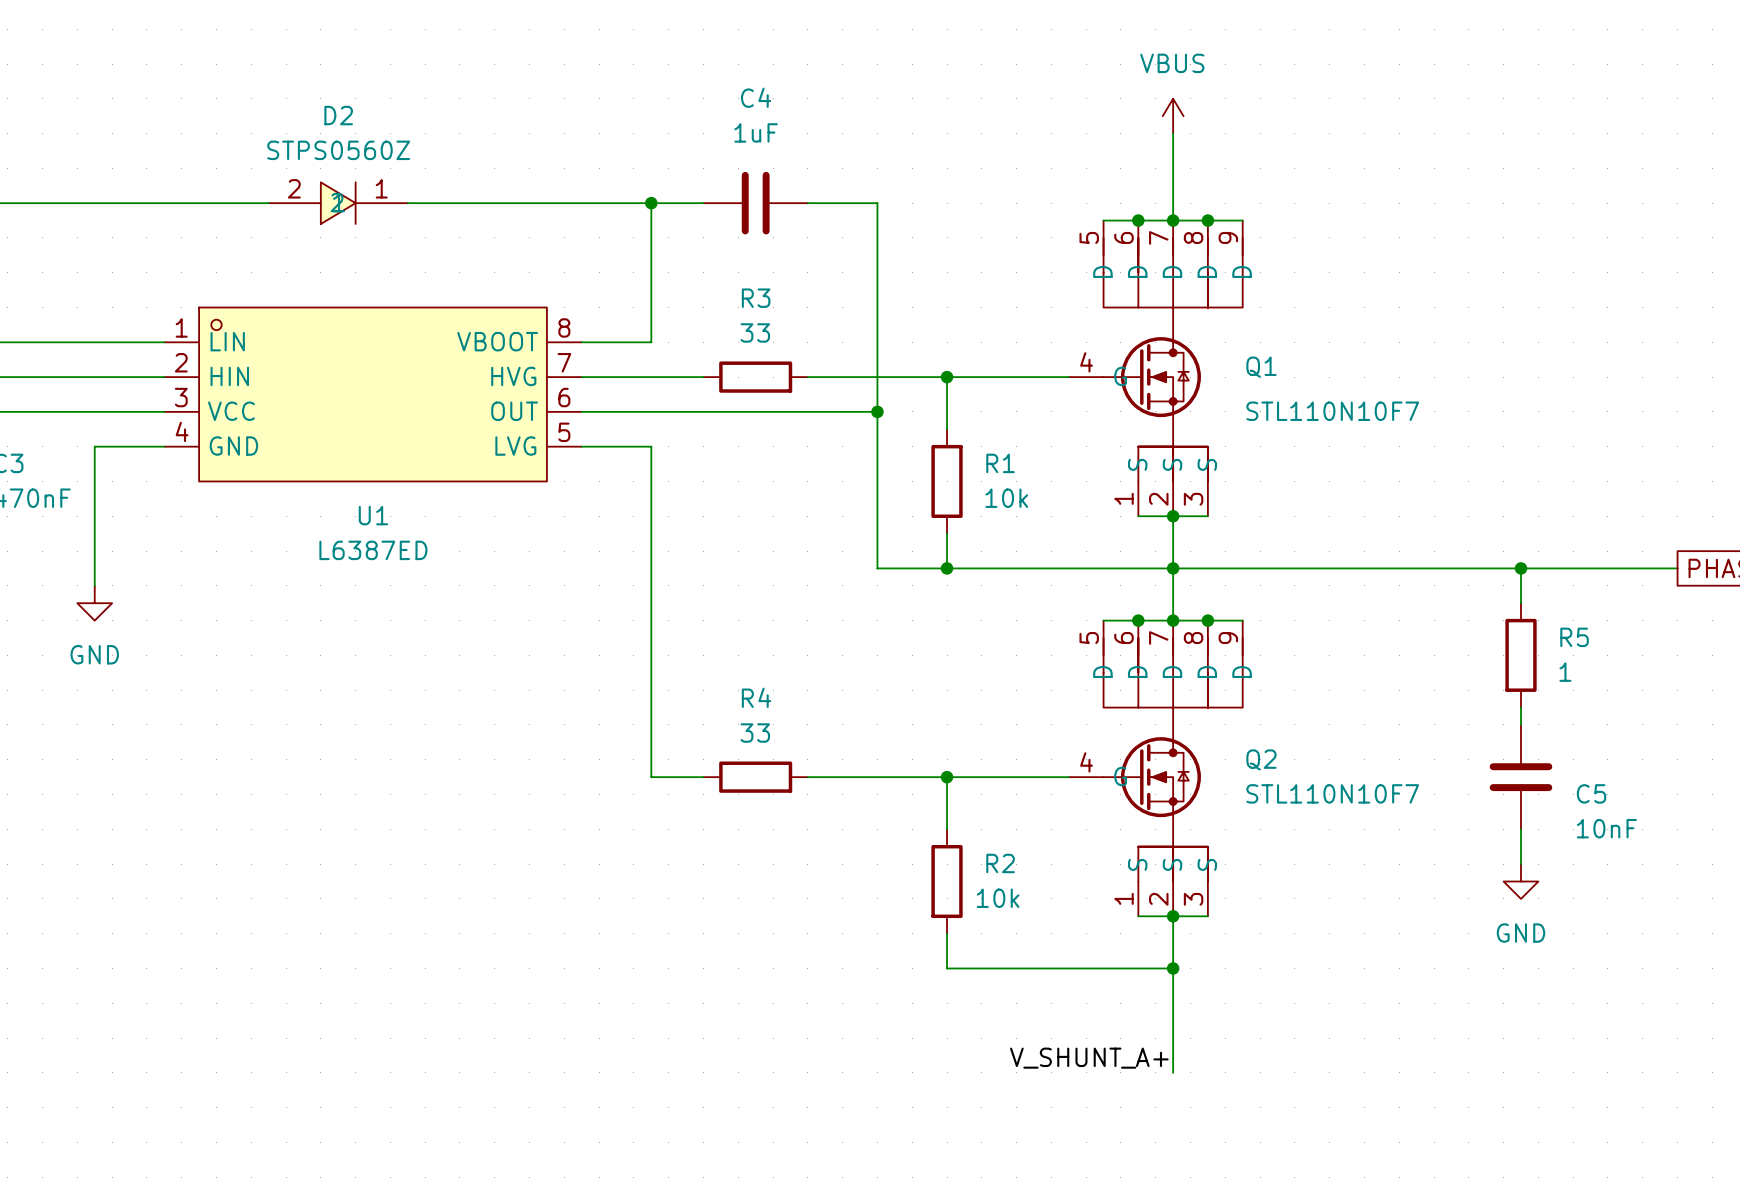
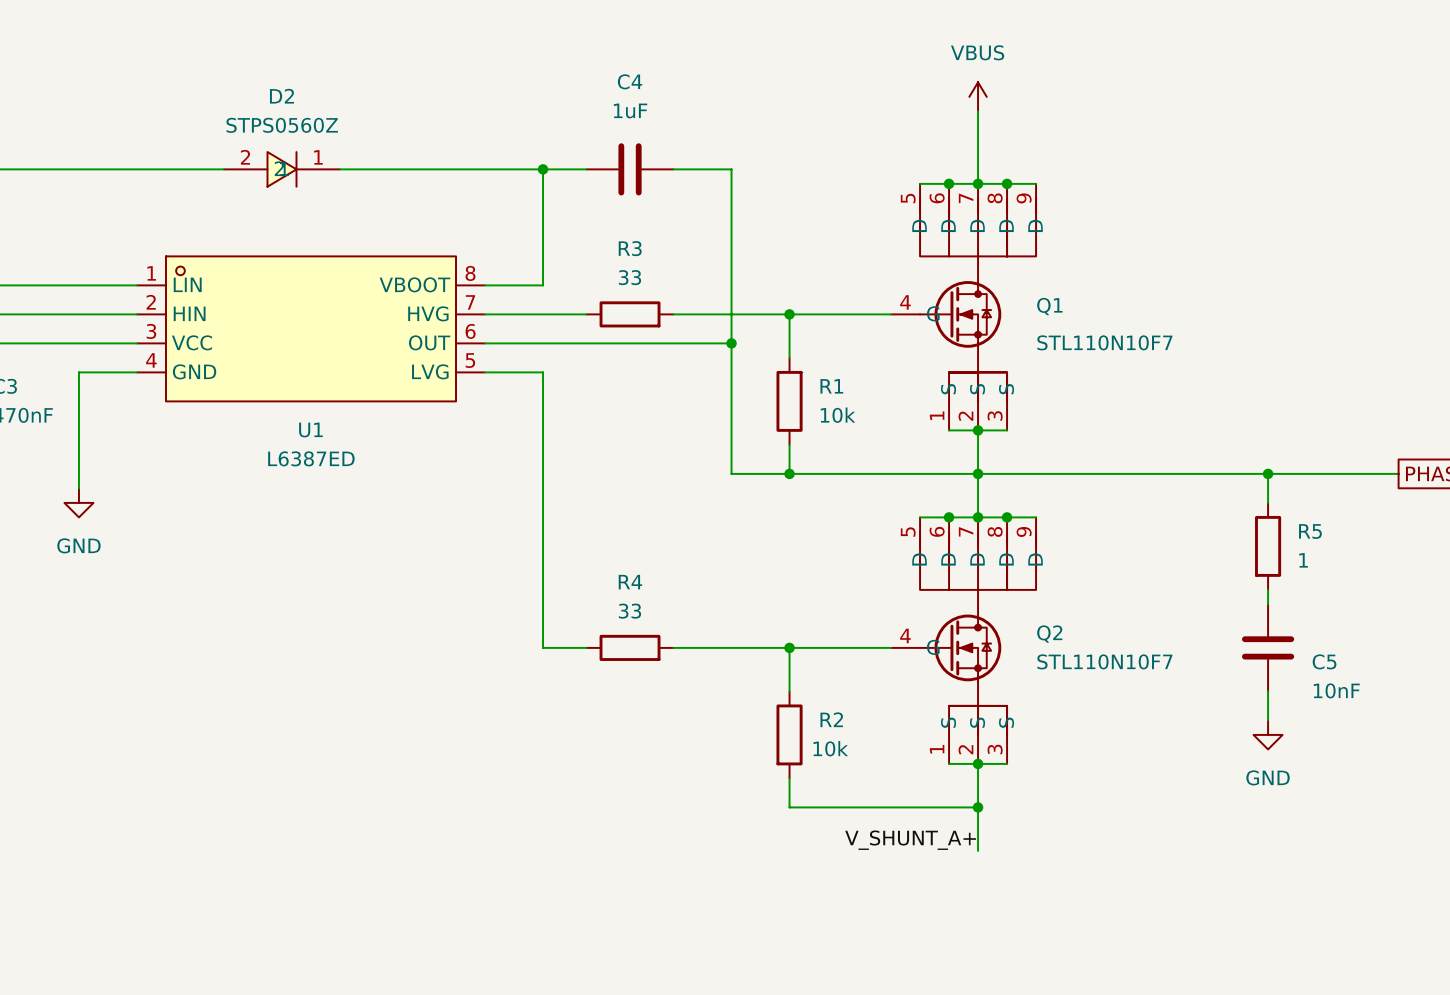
wire: (1173, 1020) (1173, 1072) -> none
label position: V_SHUNT_A+ (1089, 1058) -> V_SHUNT_A+ (910, 840)

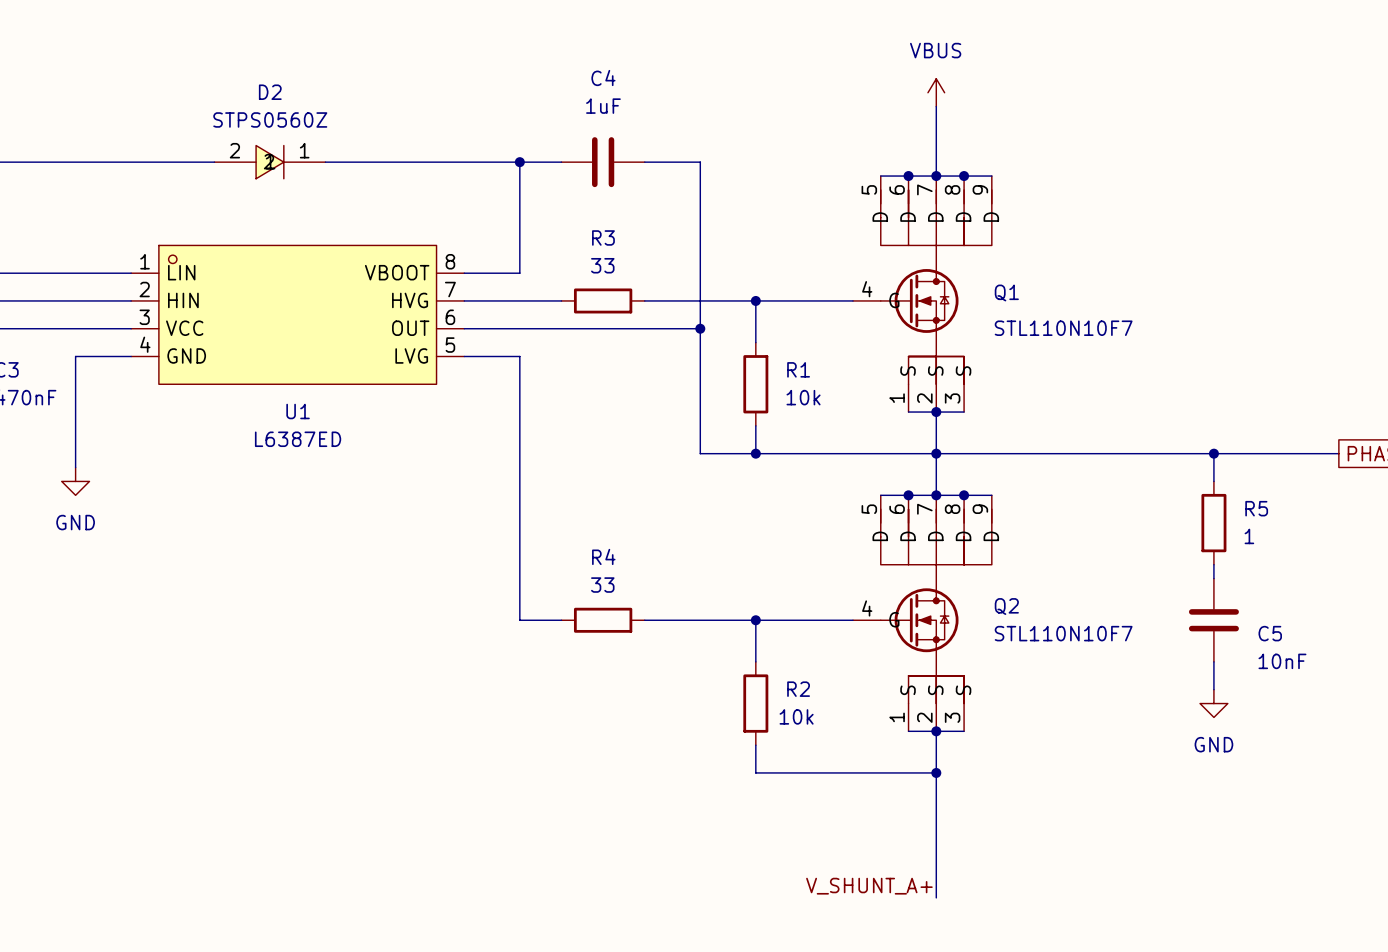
label position: V_SHUNT_A+ (910, 840) -> V_SHUNT_A+ (869, 886)
wire: none -> (936, 814) (936, 897)

